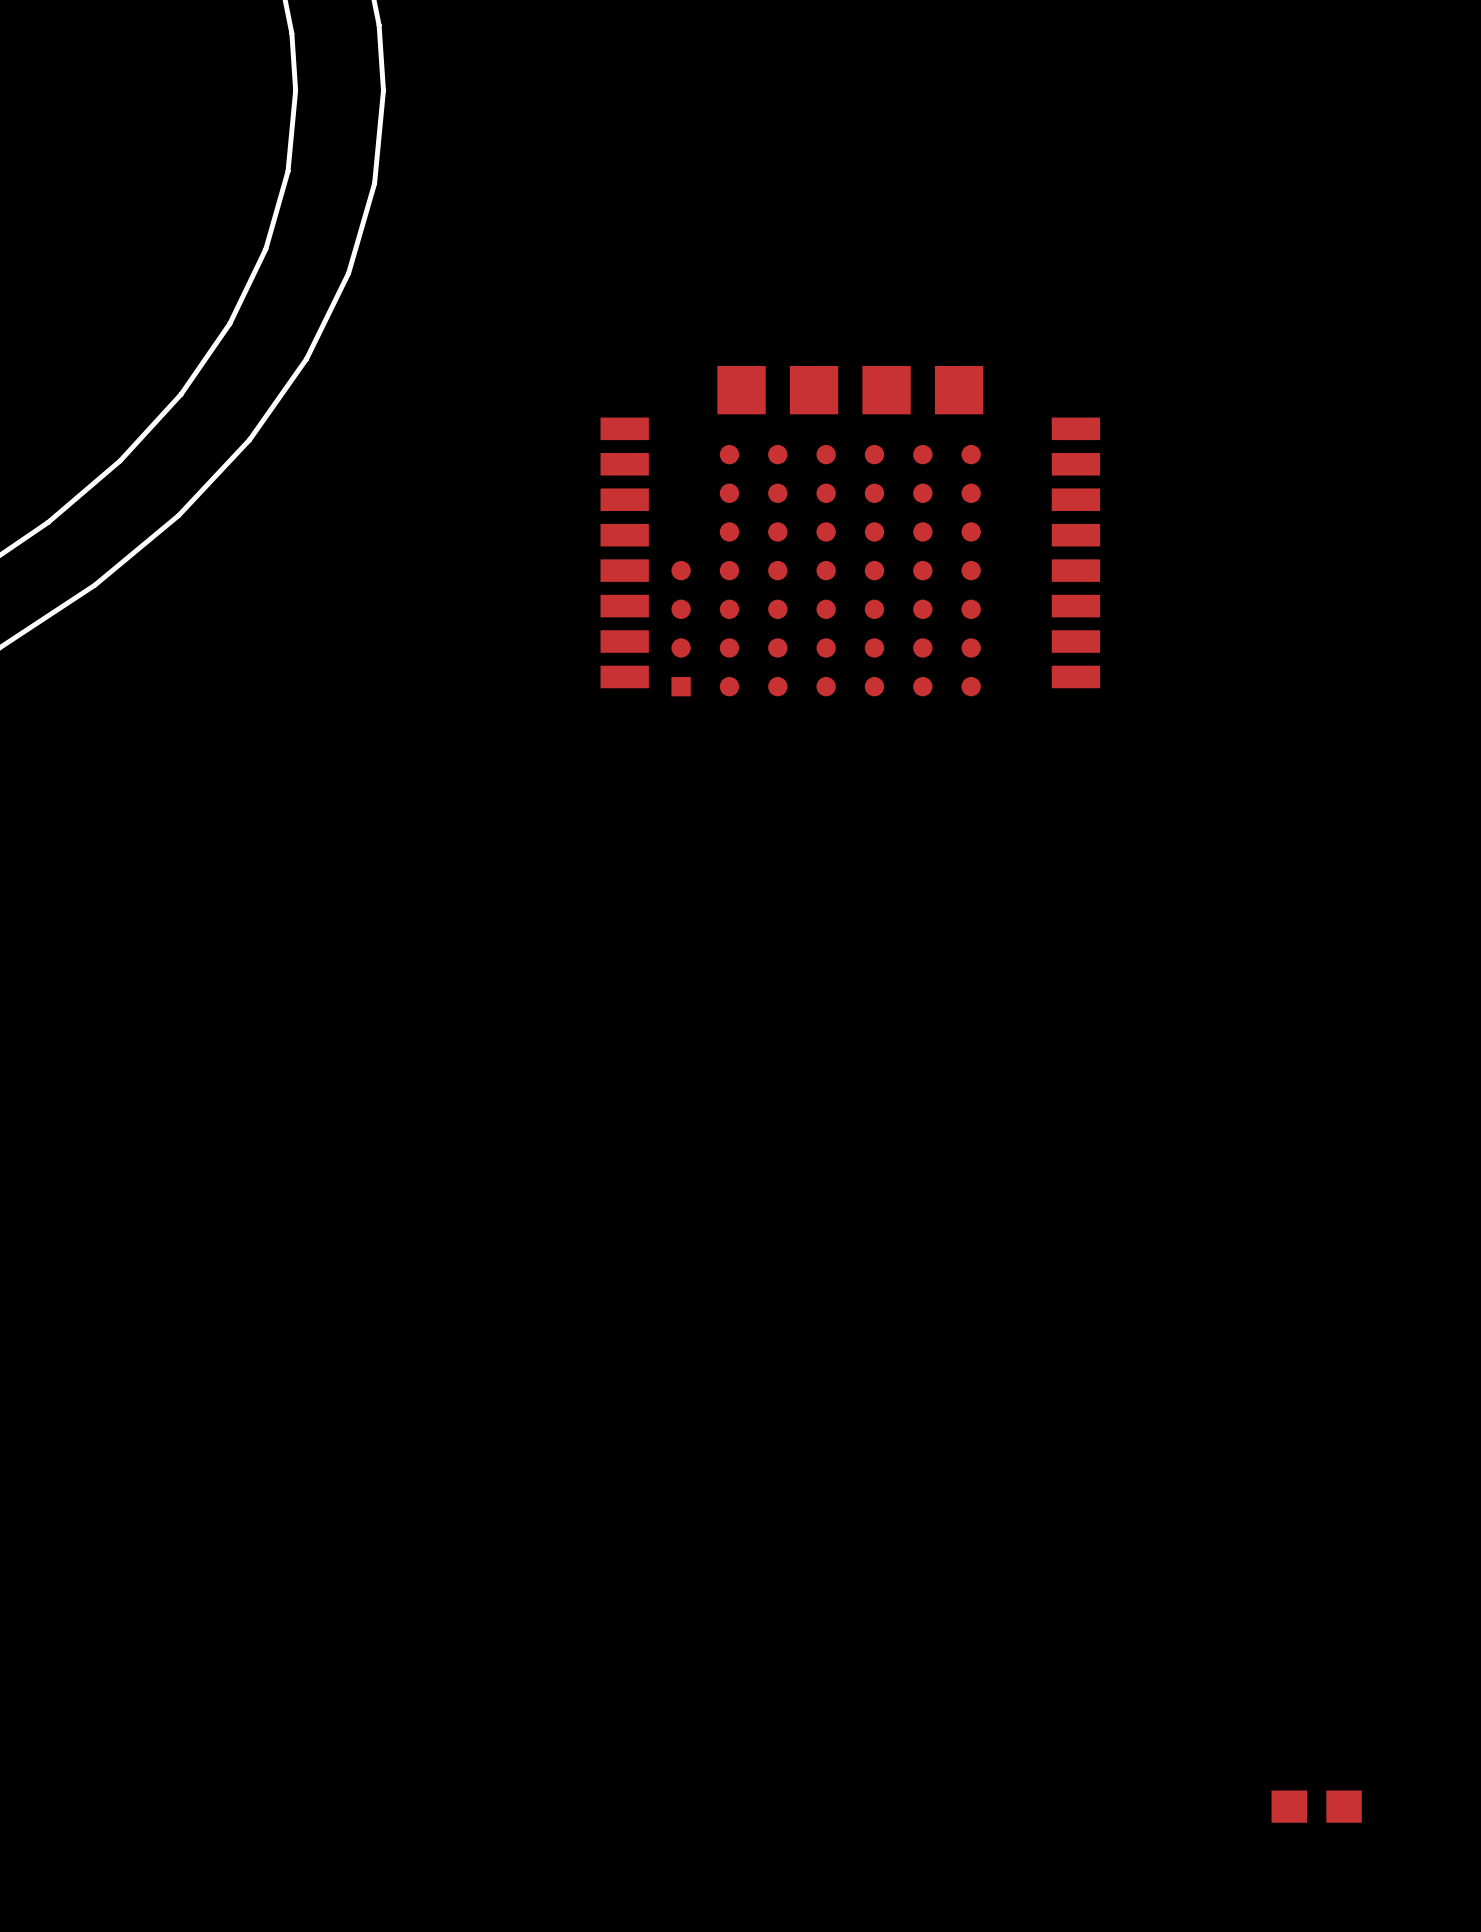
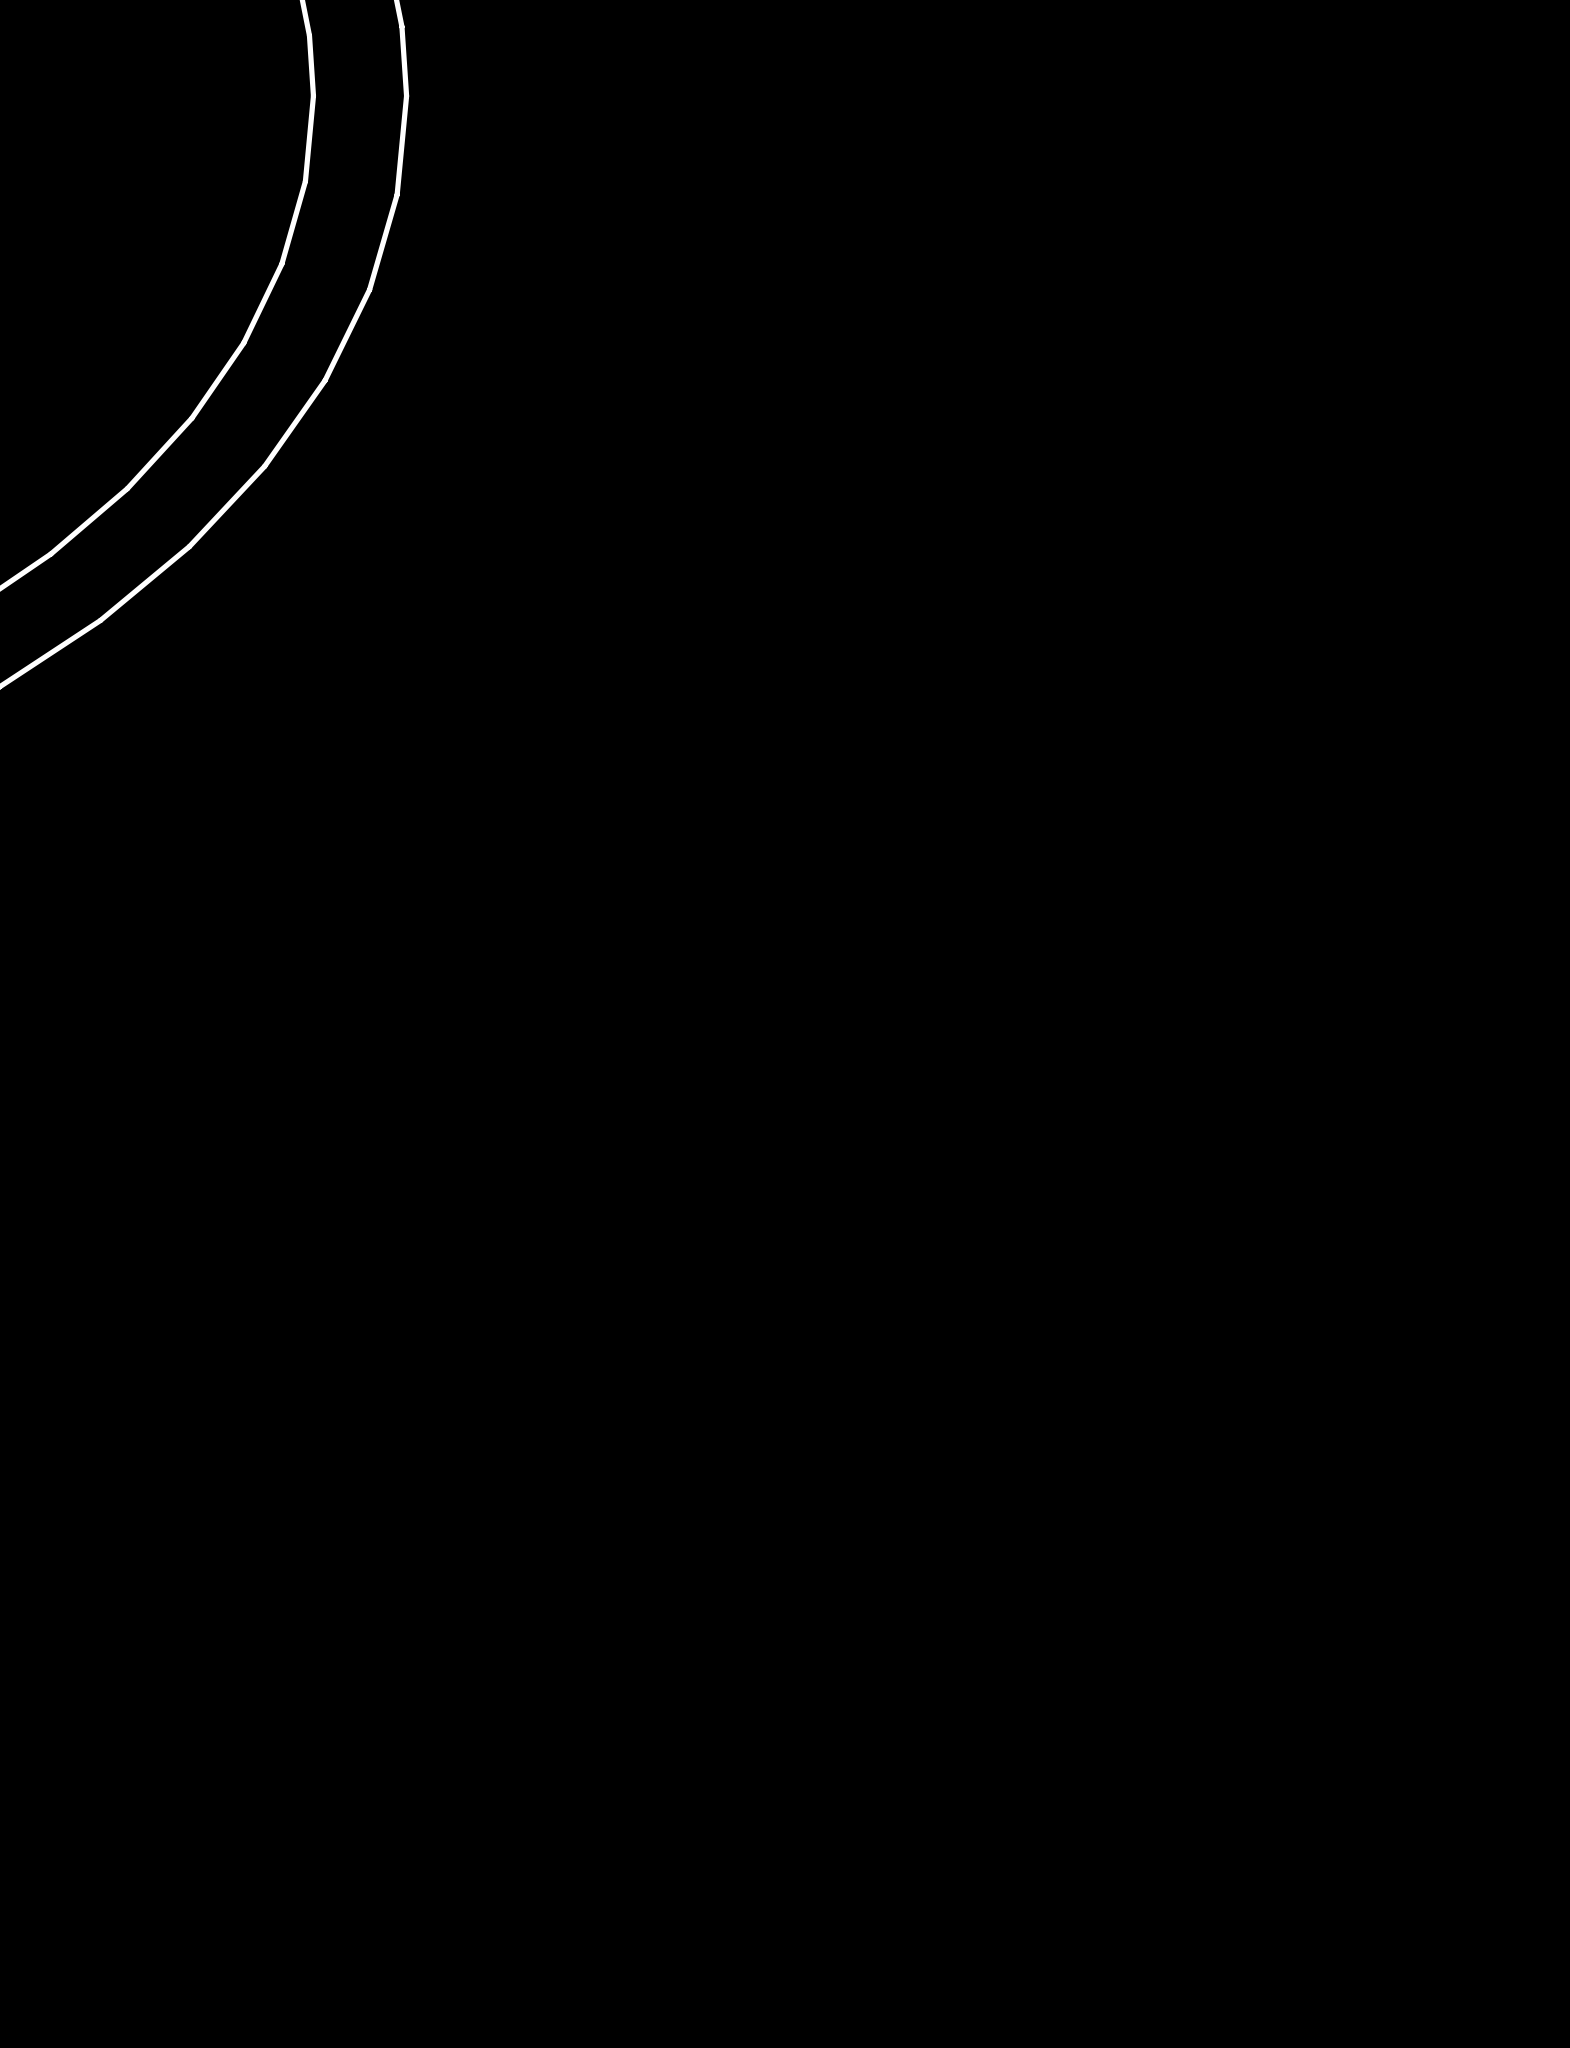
part: (850, 531) -> none
part: (1316, 1806) -> none

